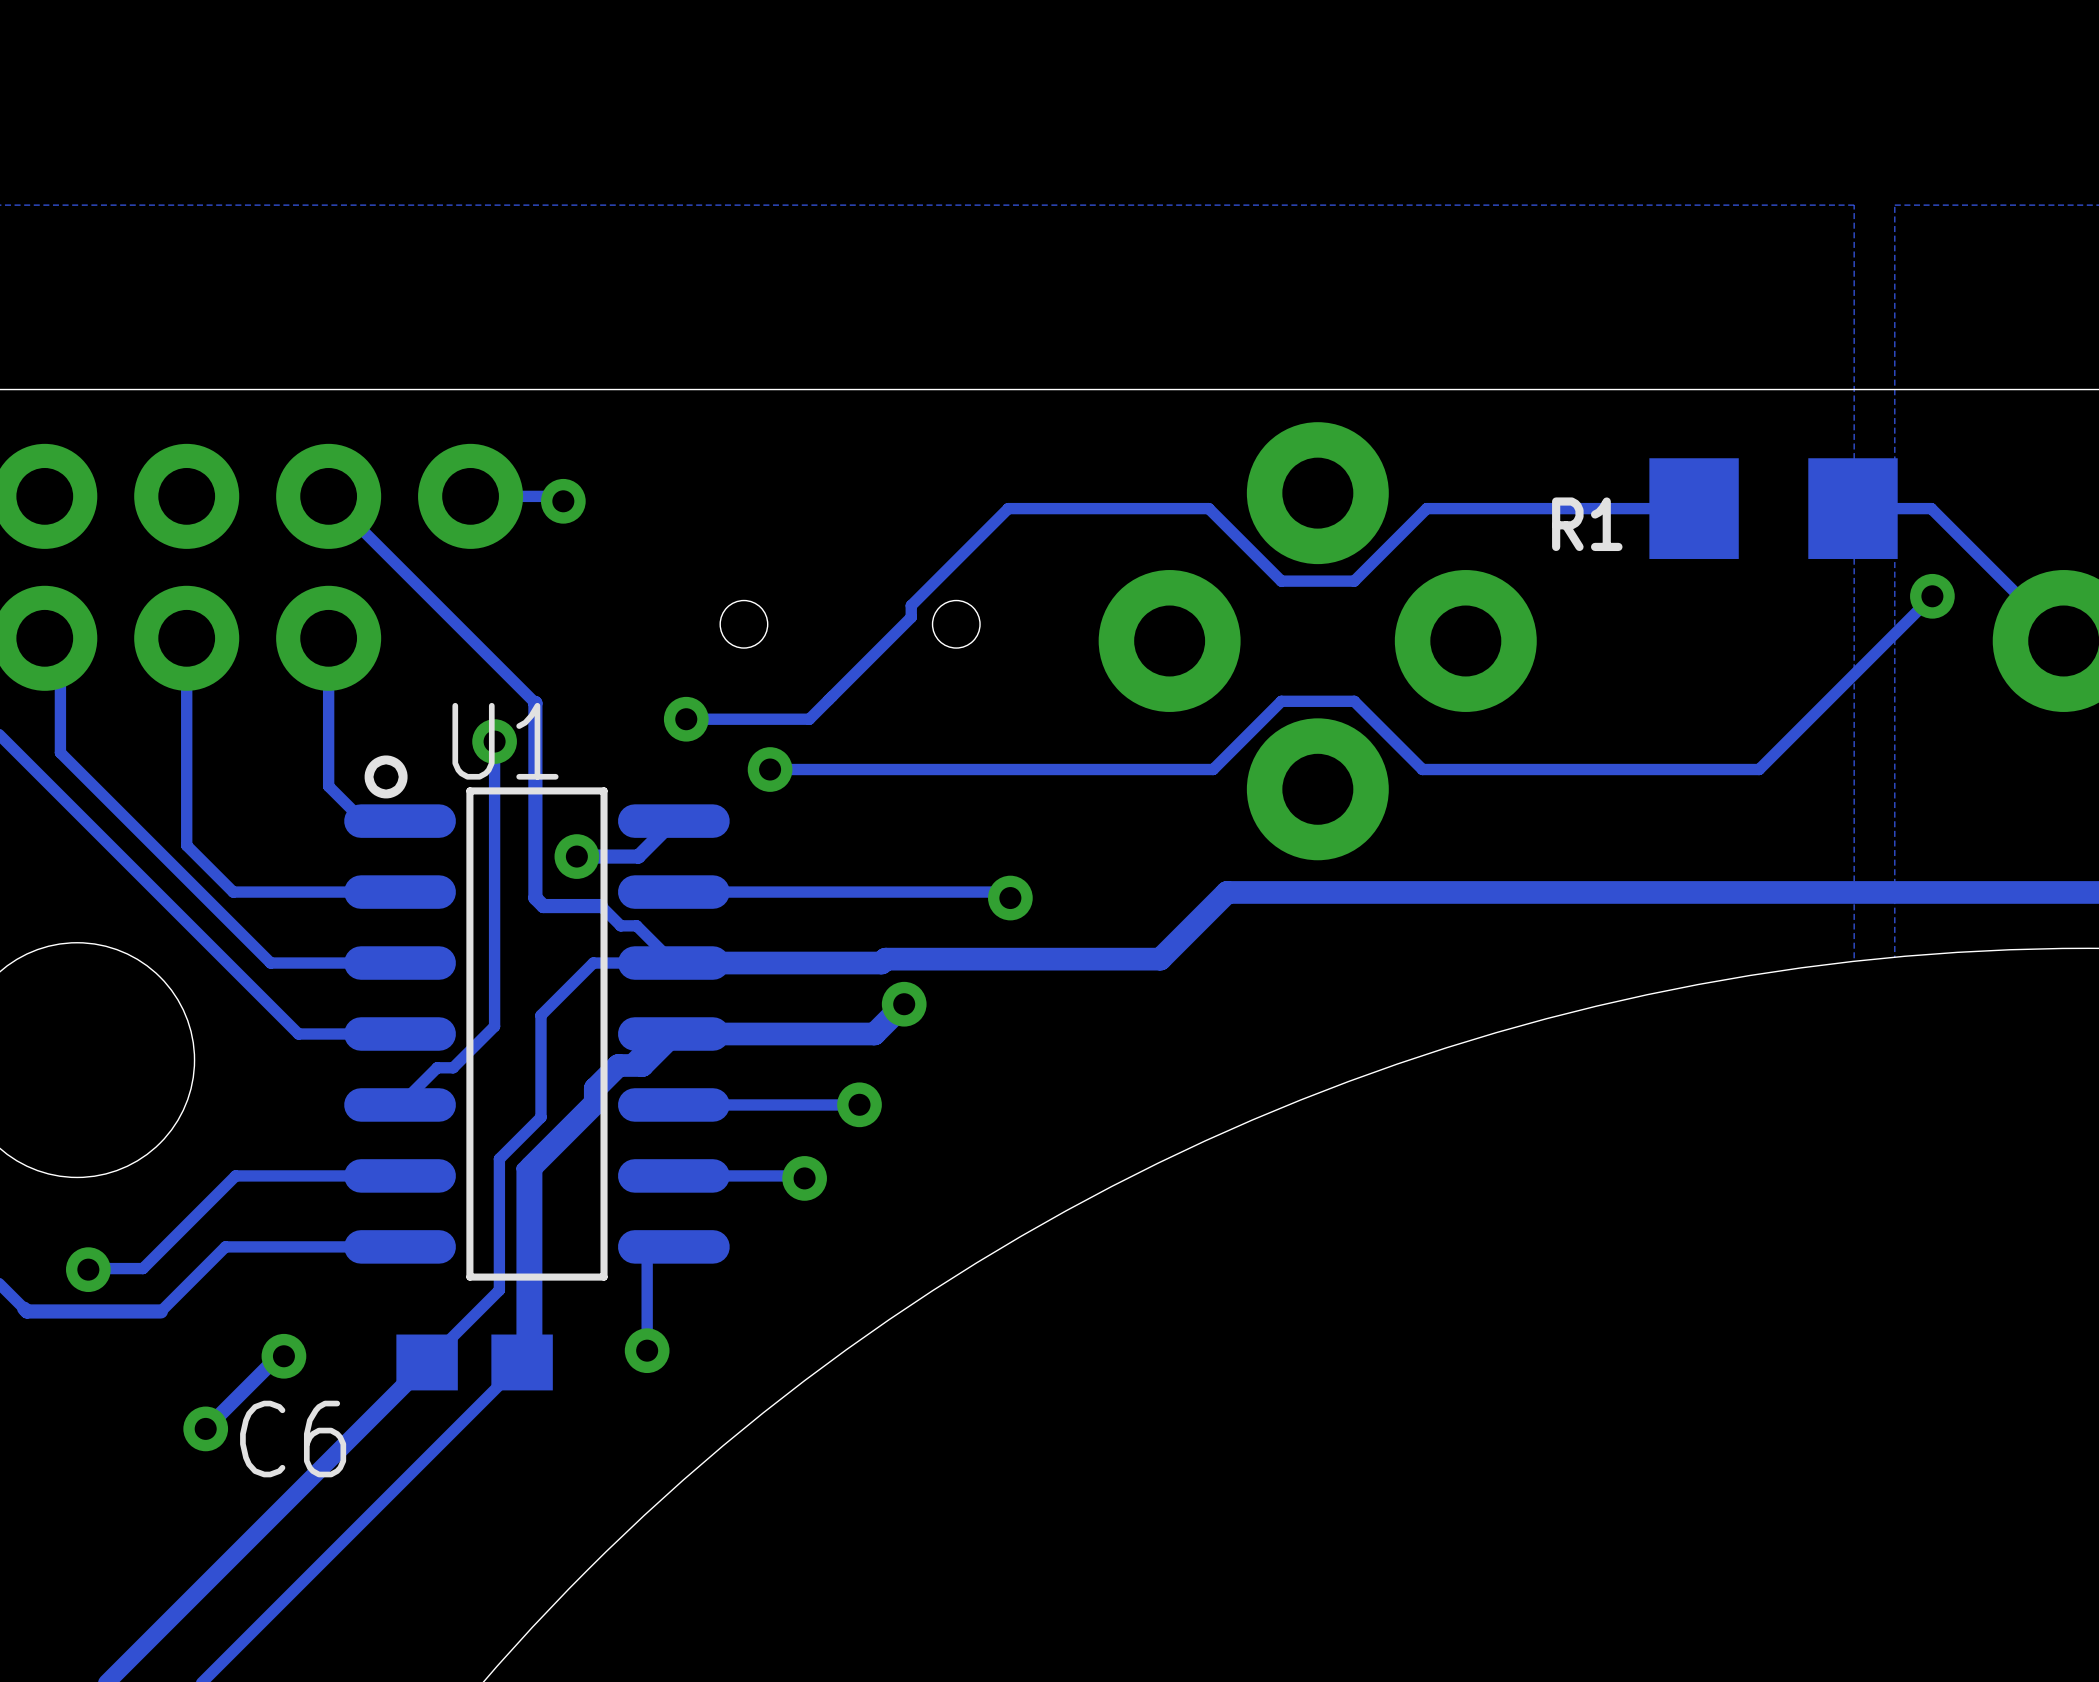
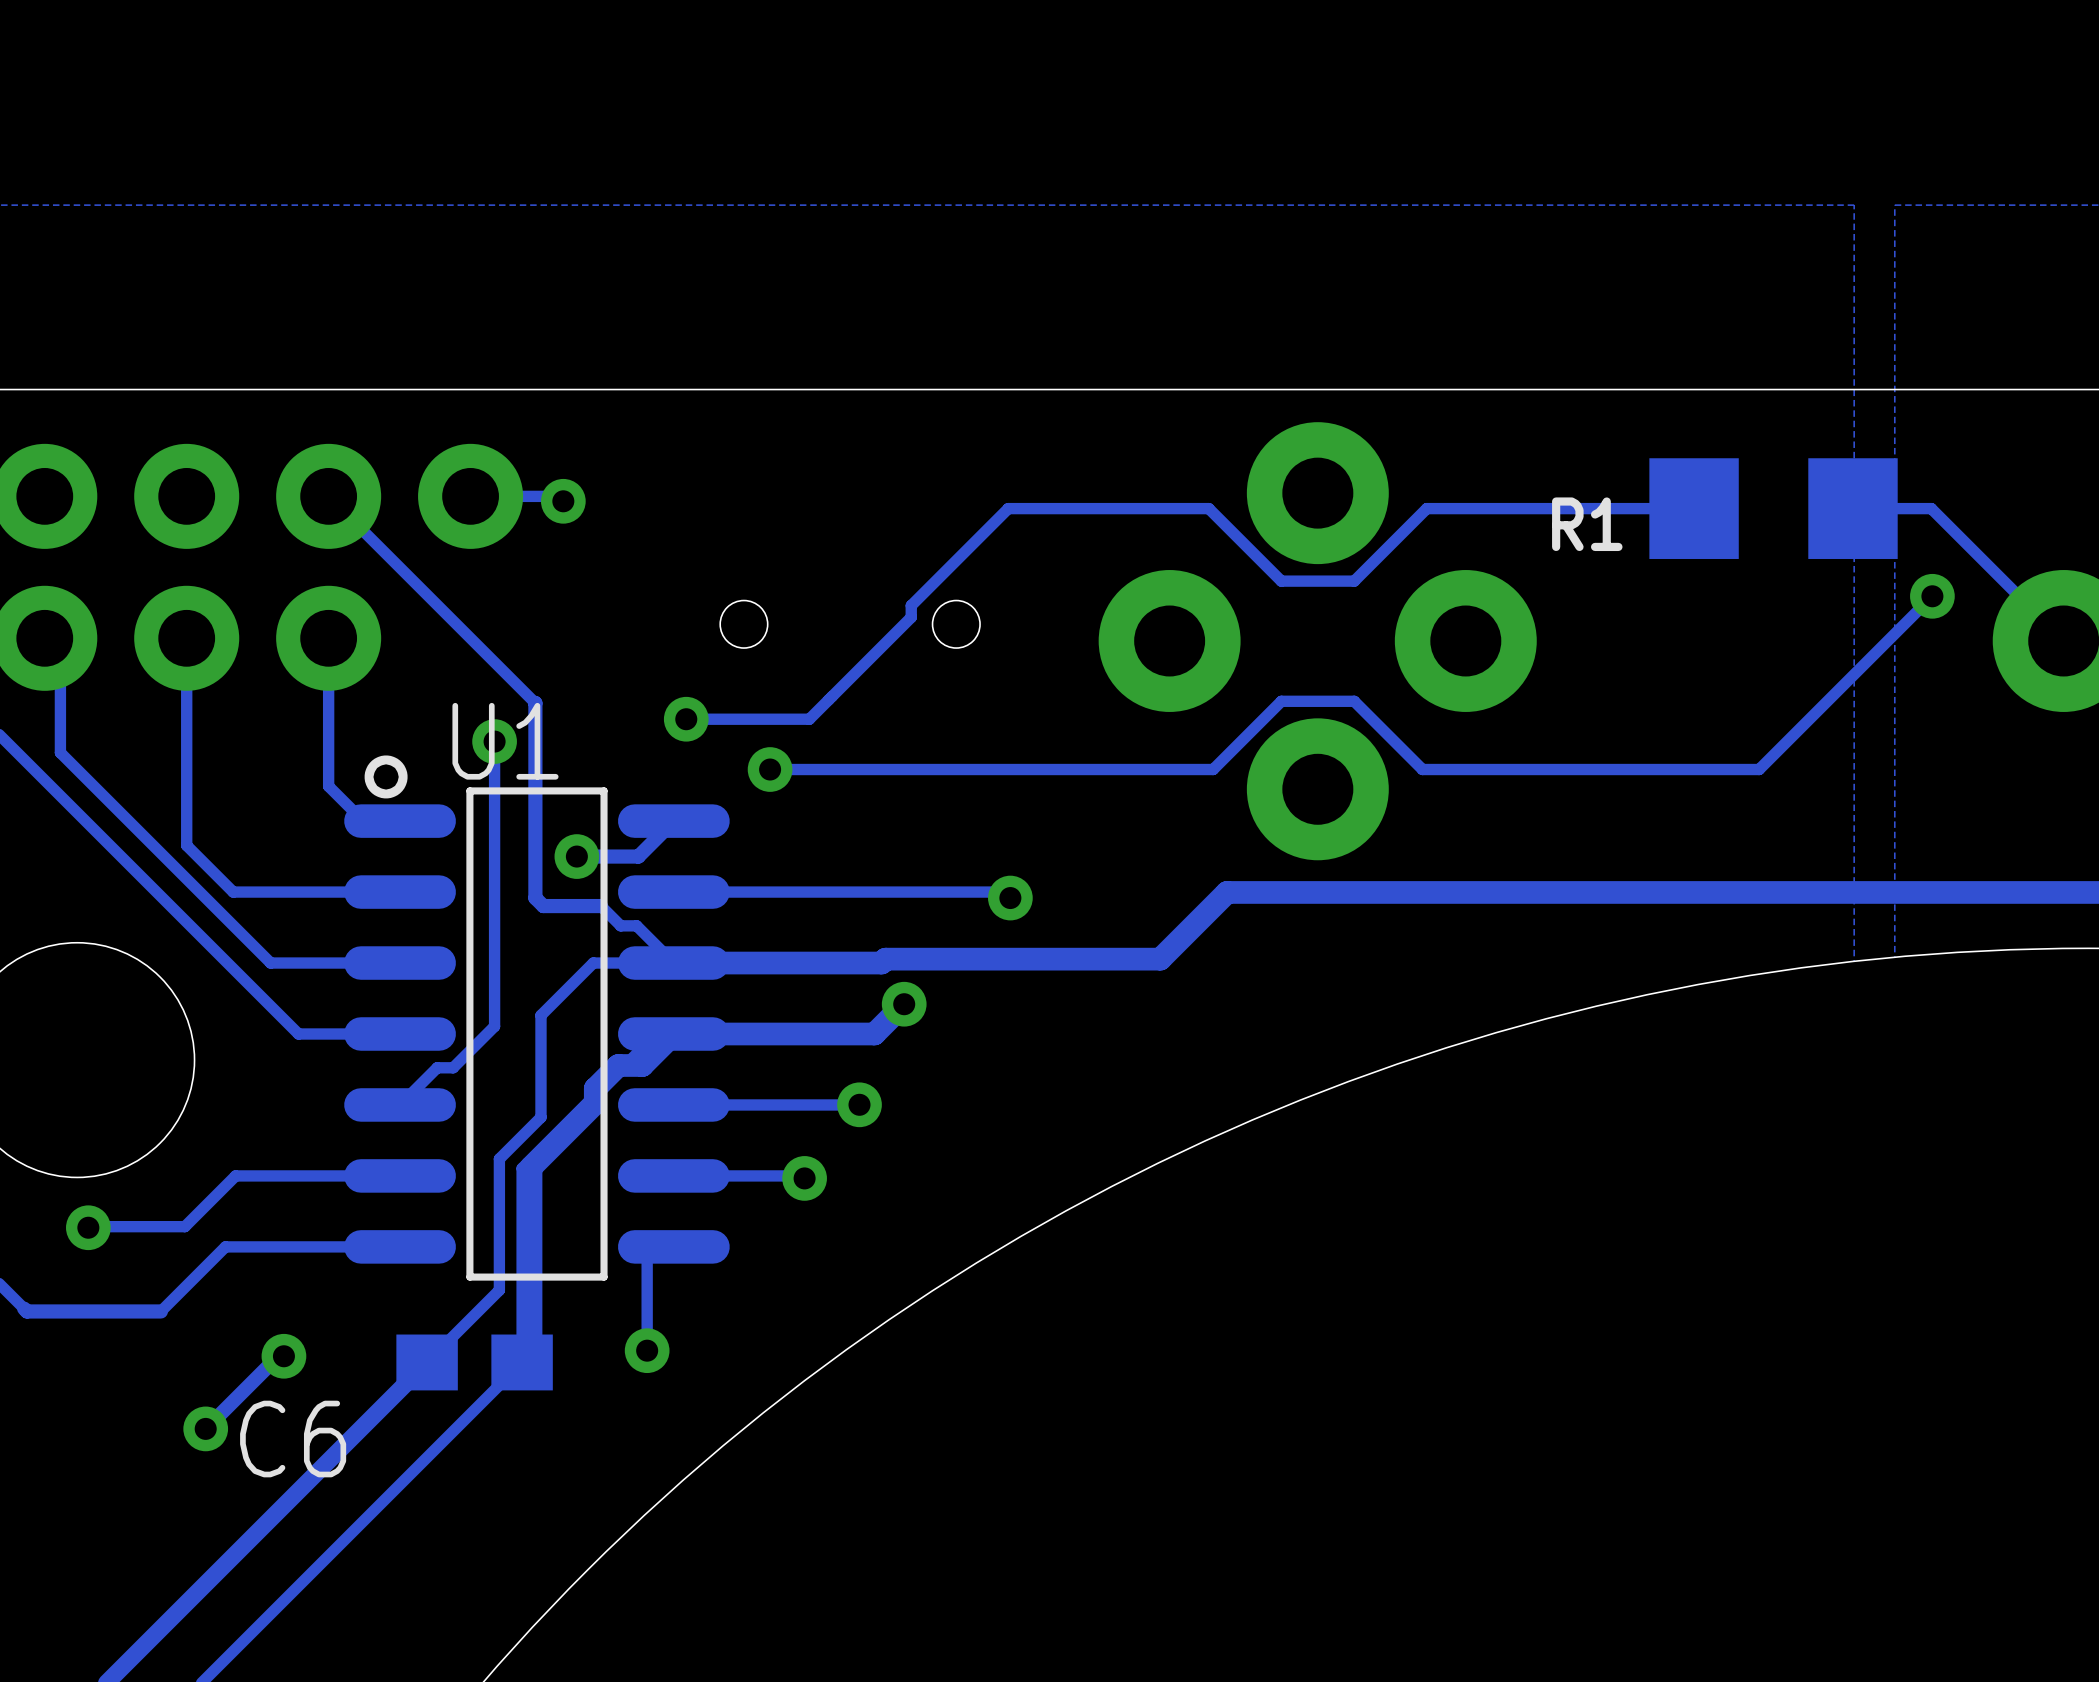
track: (184, 1226) (142, 1268) (88, 1269) -> (184, 1226) (88, 1227)
via position: (88, 1269) -> (88, 1227)

